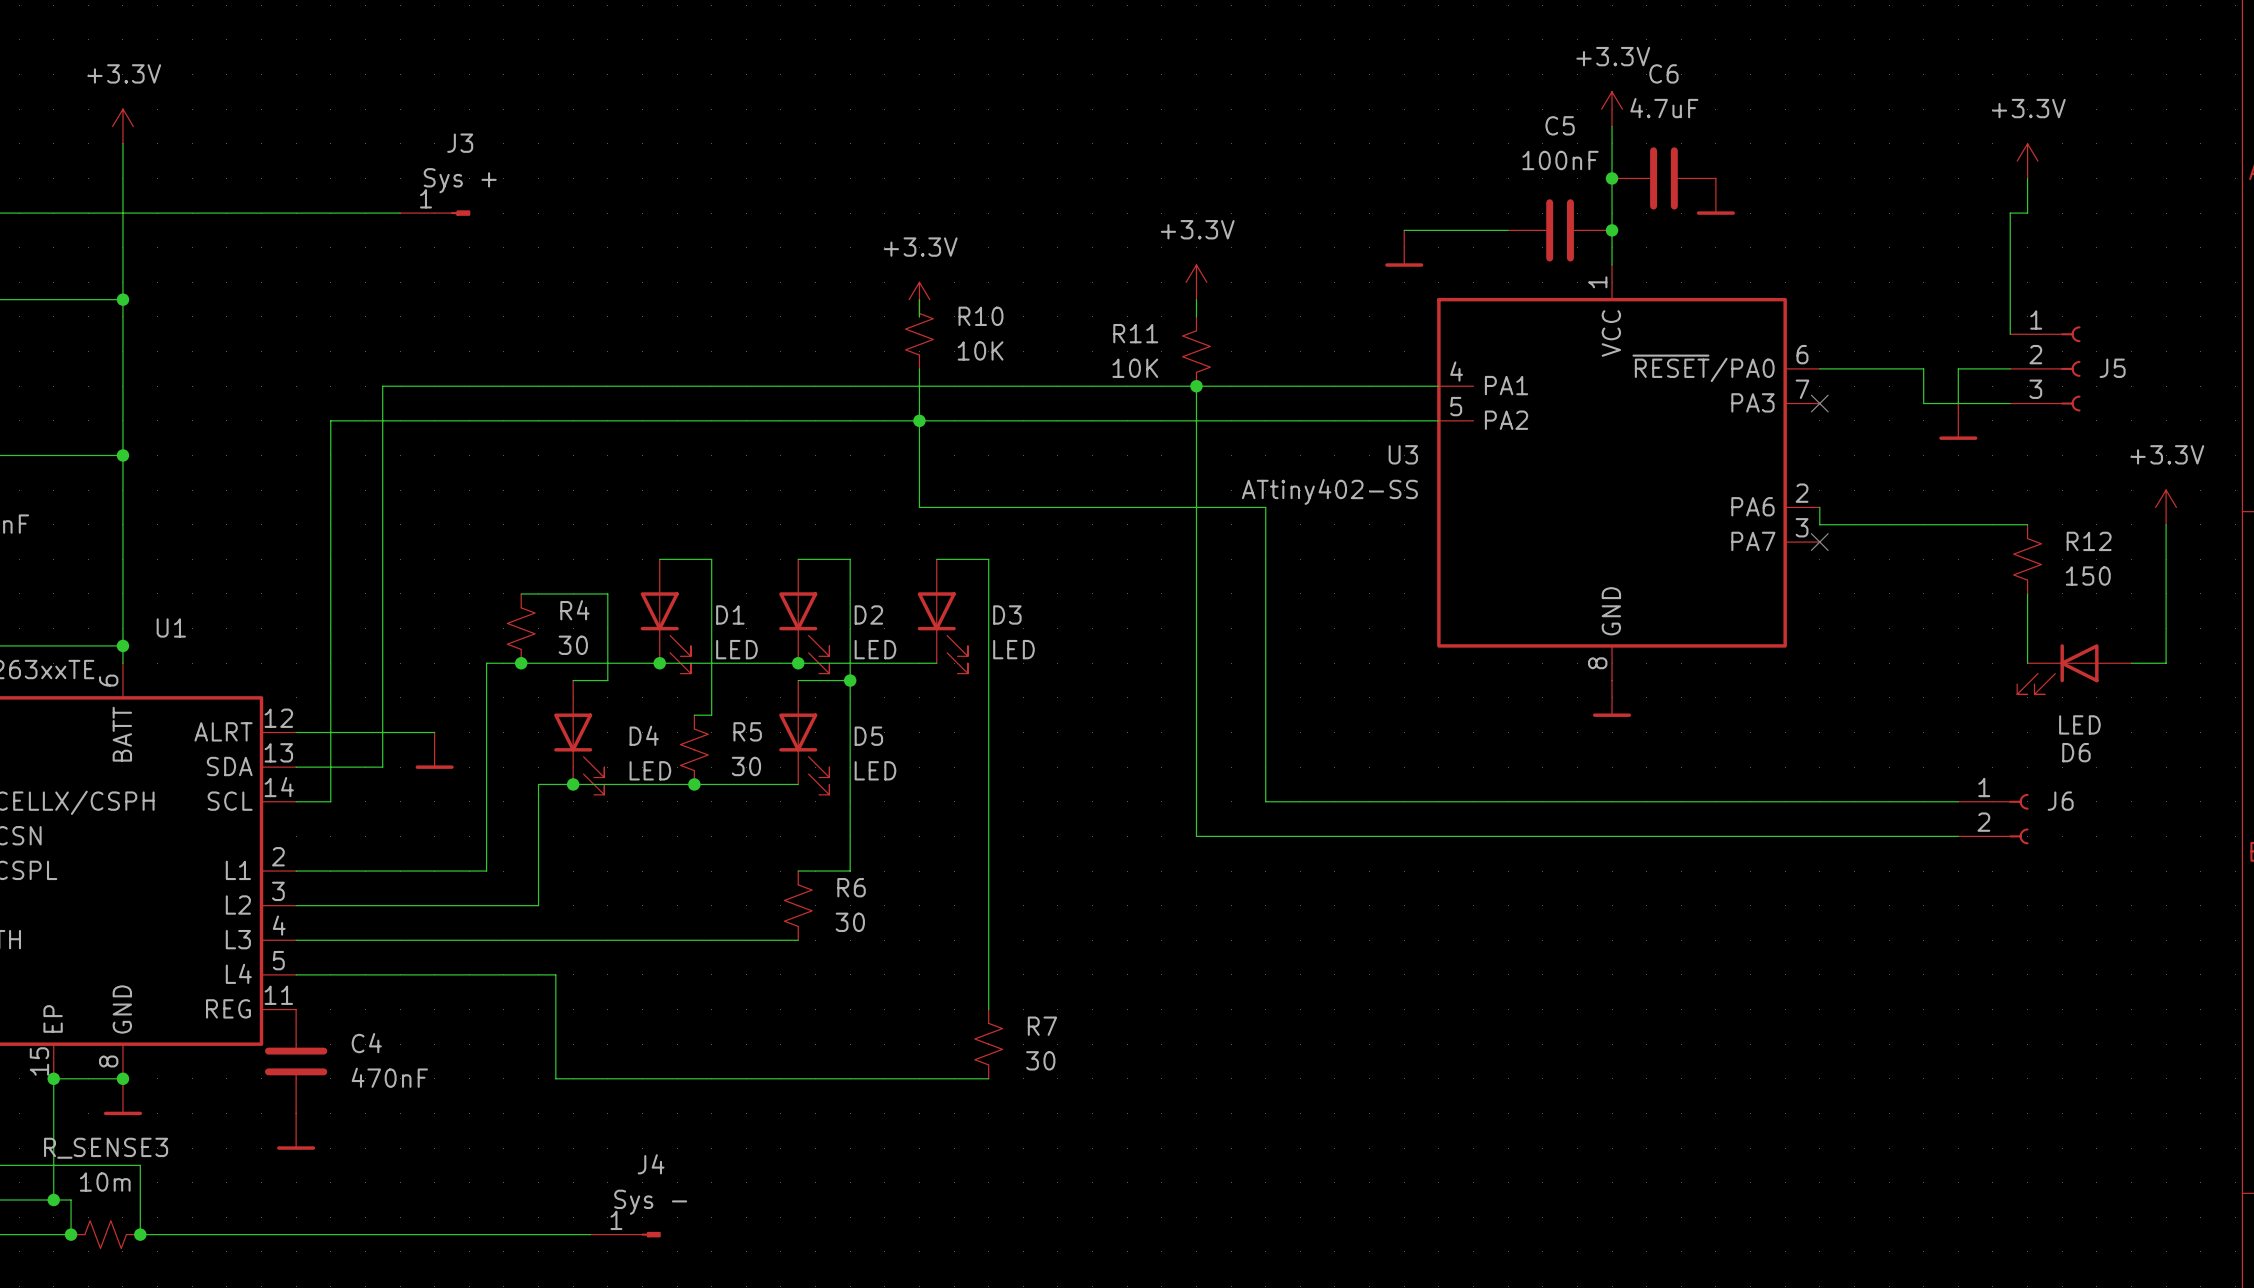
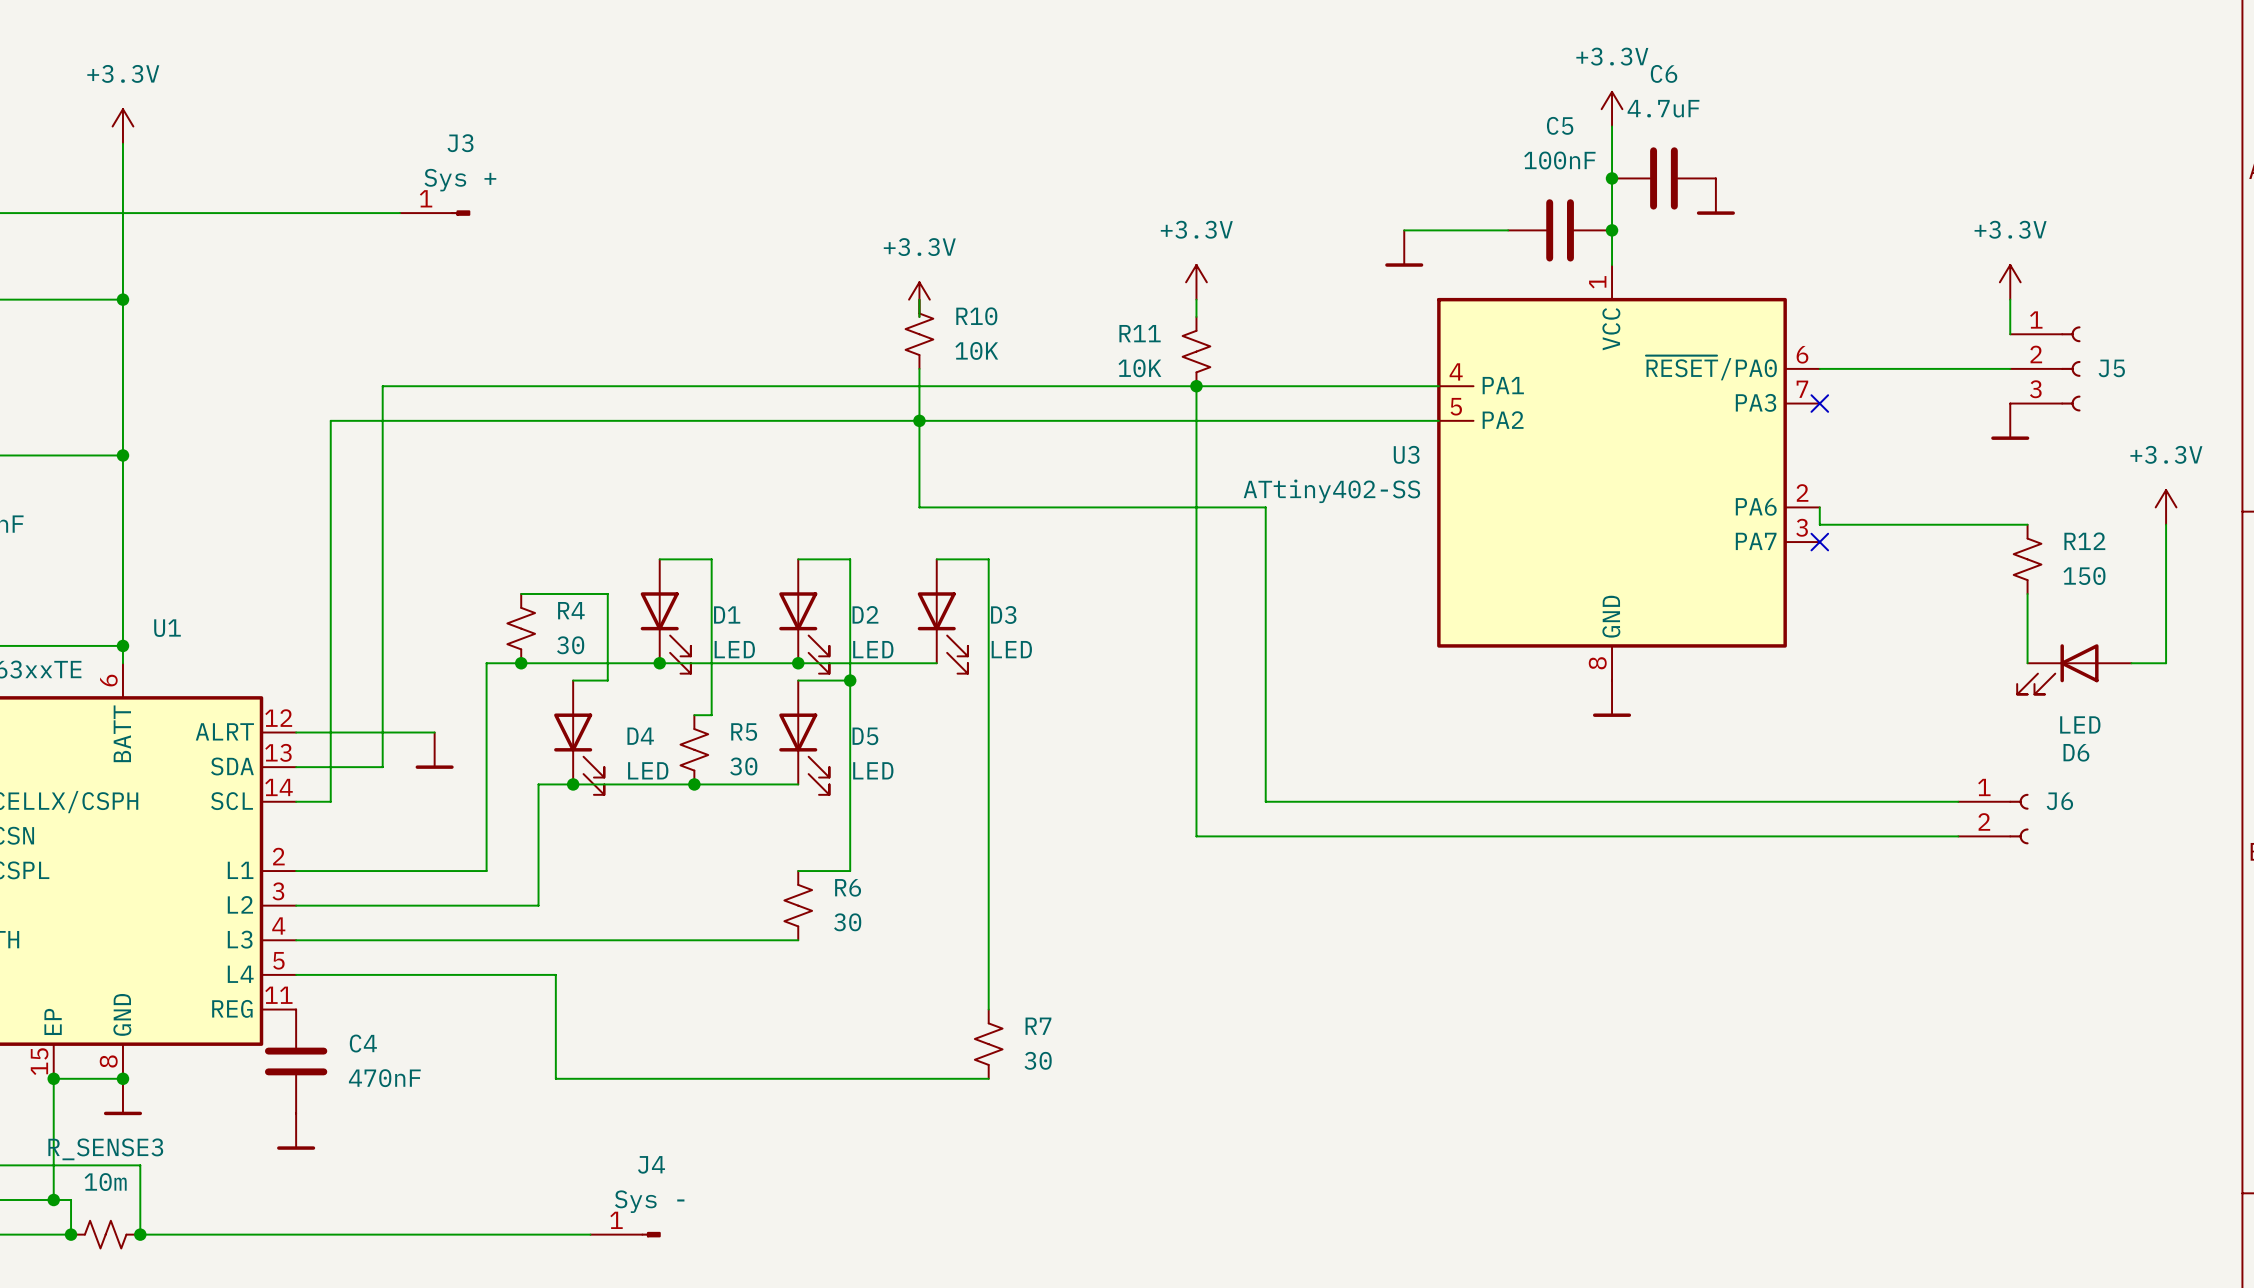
power symbol position: +3.3V (2027, 161) -> +3.3V (2010, 282)
wire: (2027, 178) (2027, 213) (2010, 213) (2010, 299) -> none
wire: (1923, 368) (1923, 403) (2010, 403) -> none
wire: (1958, 368) (1958, 403) -> (1958, 368) (1923, 368)
power symbol position: (1958, 421) -> (2010, 421)

